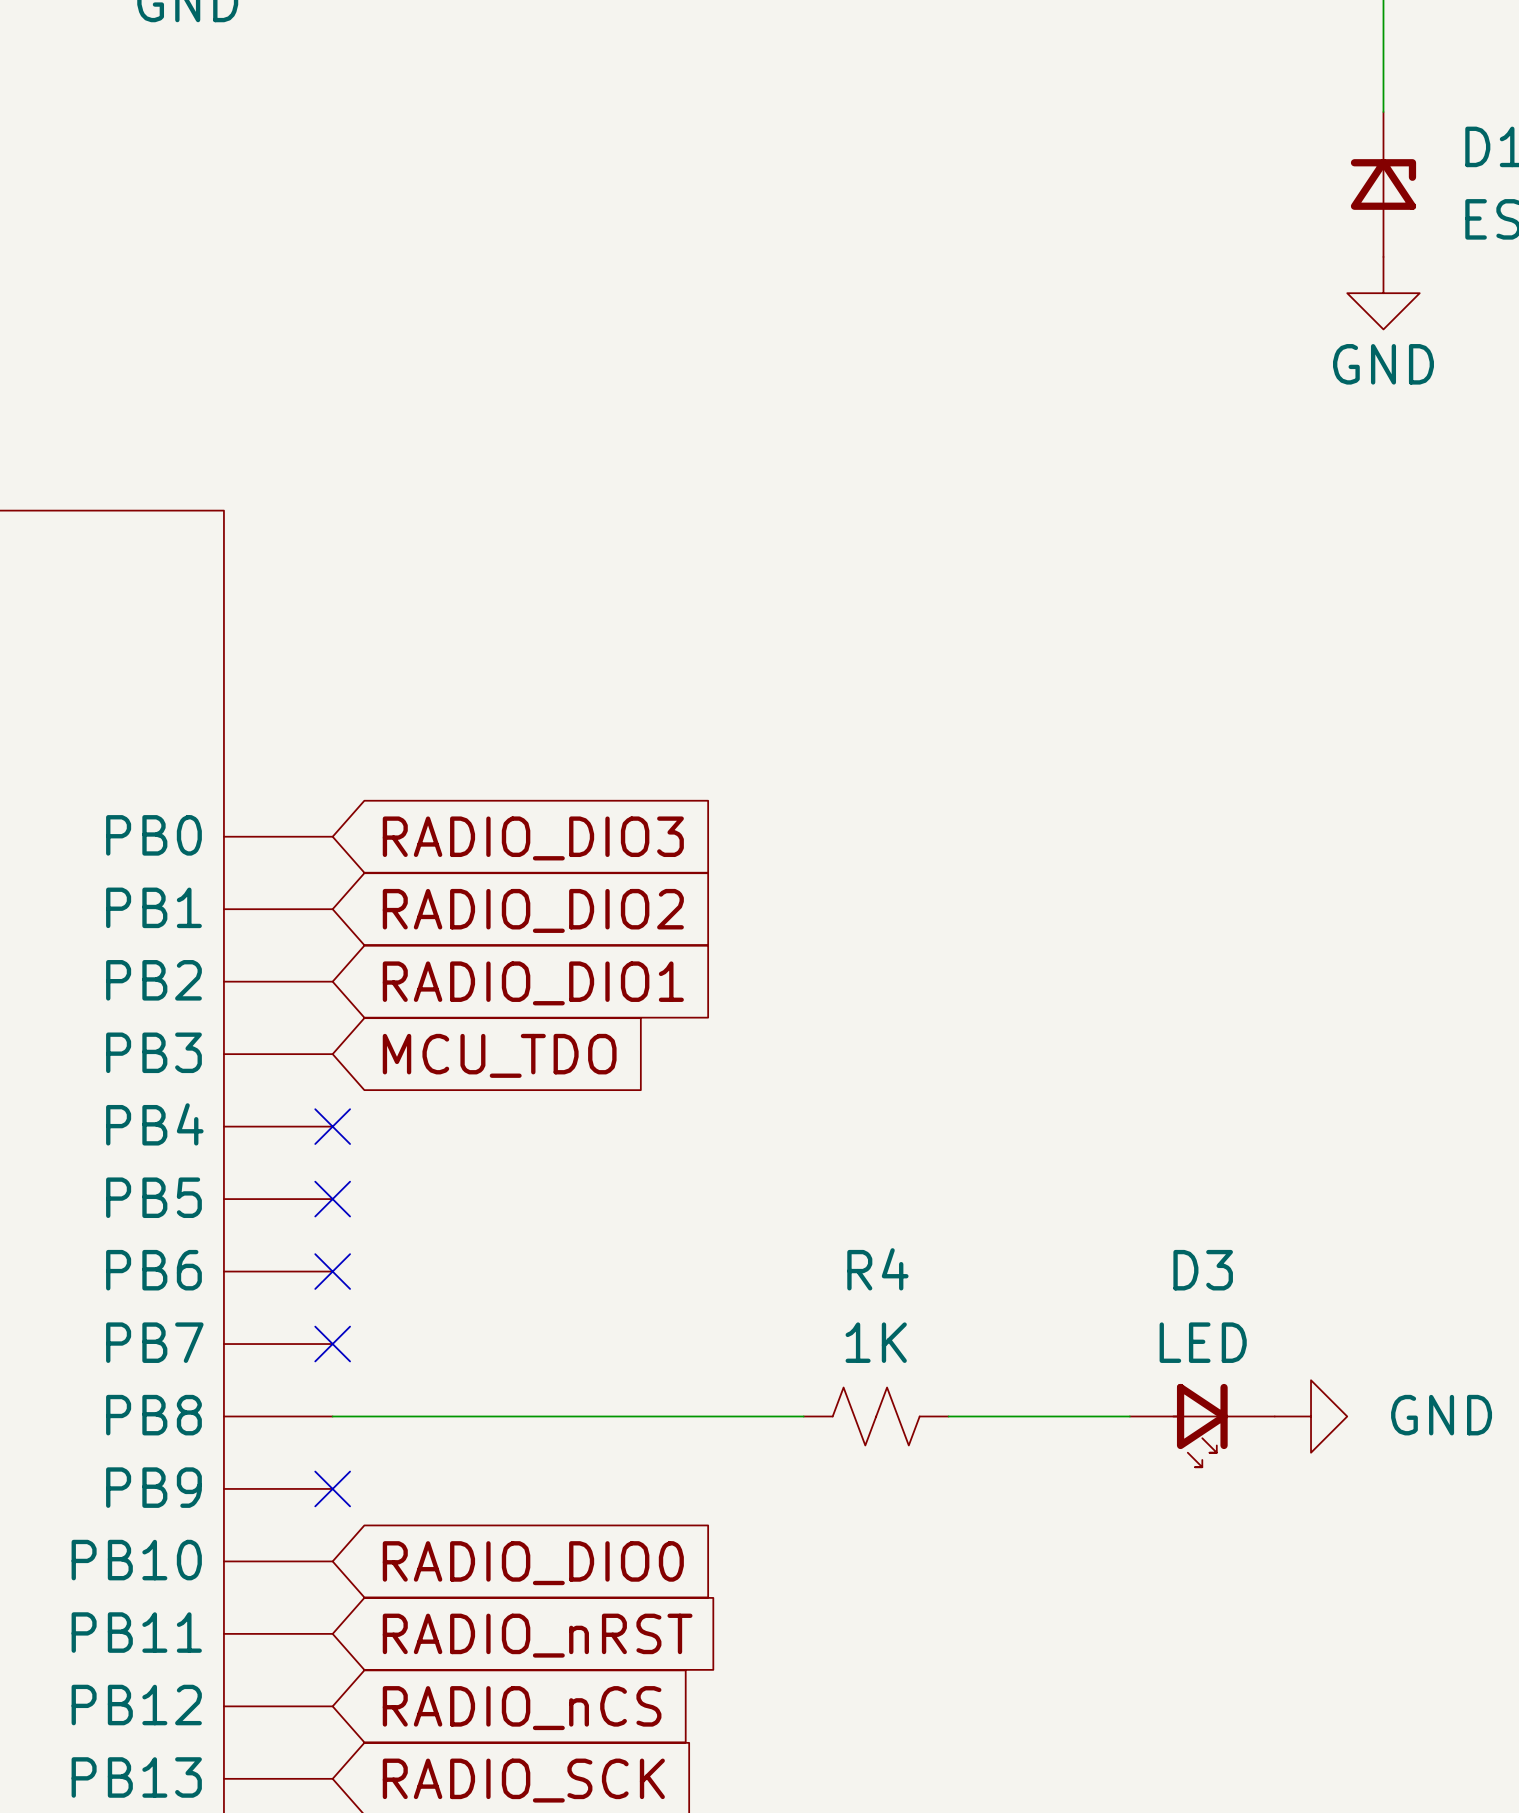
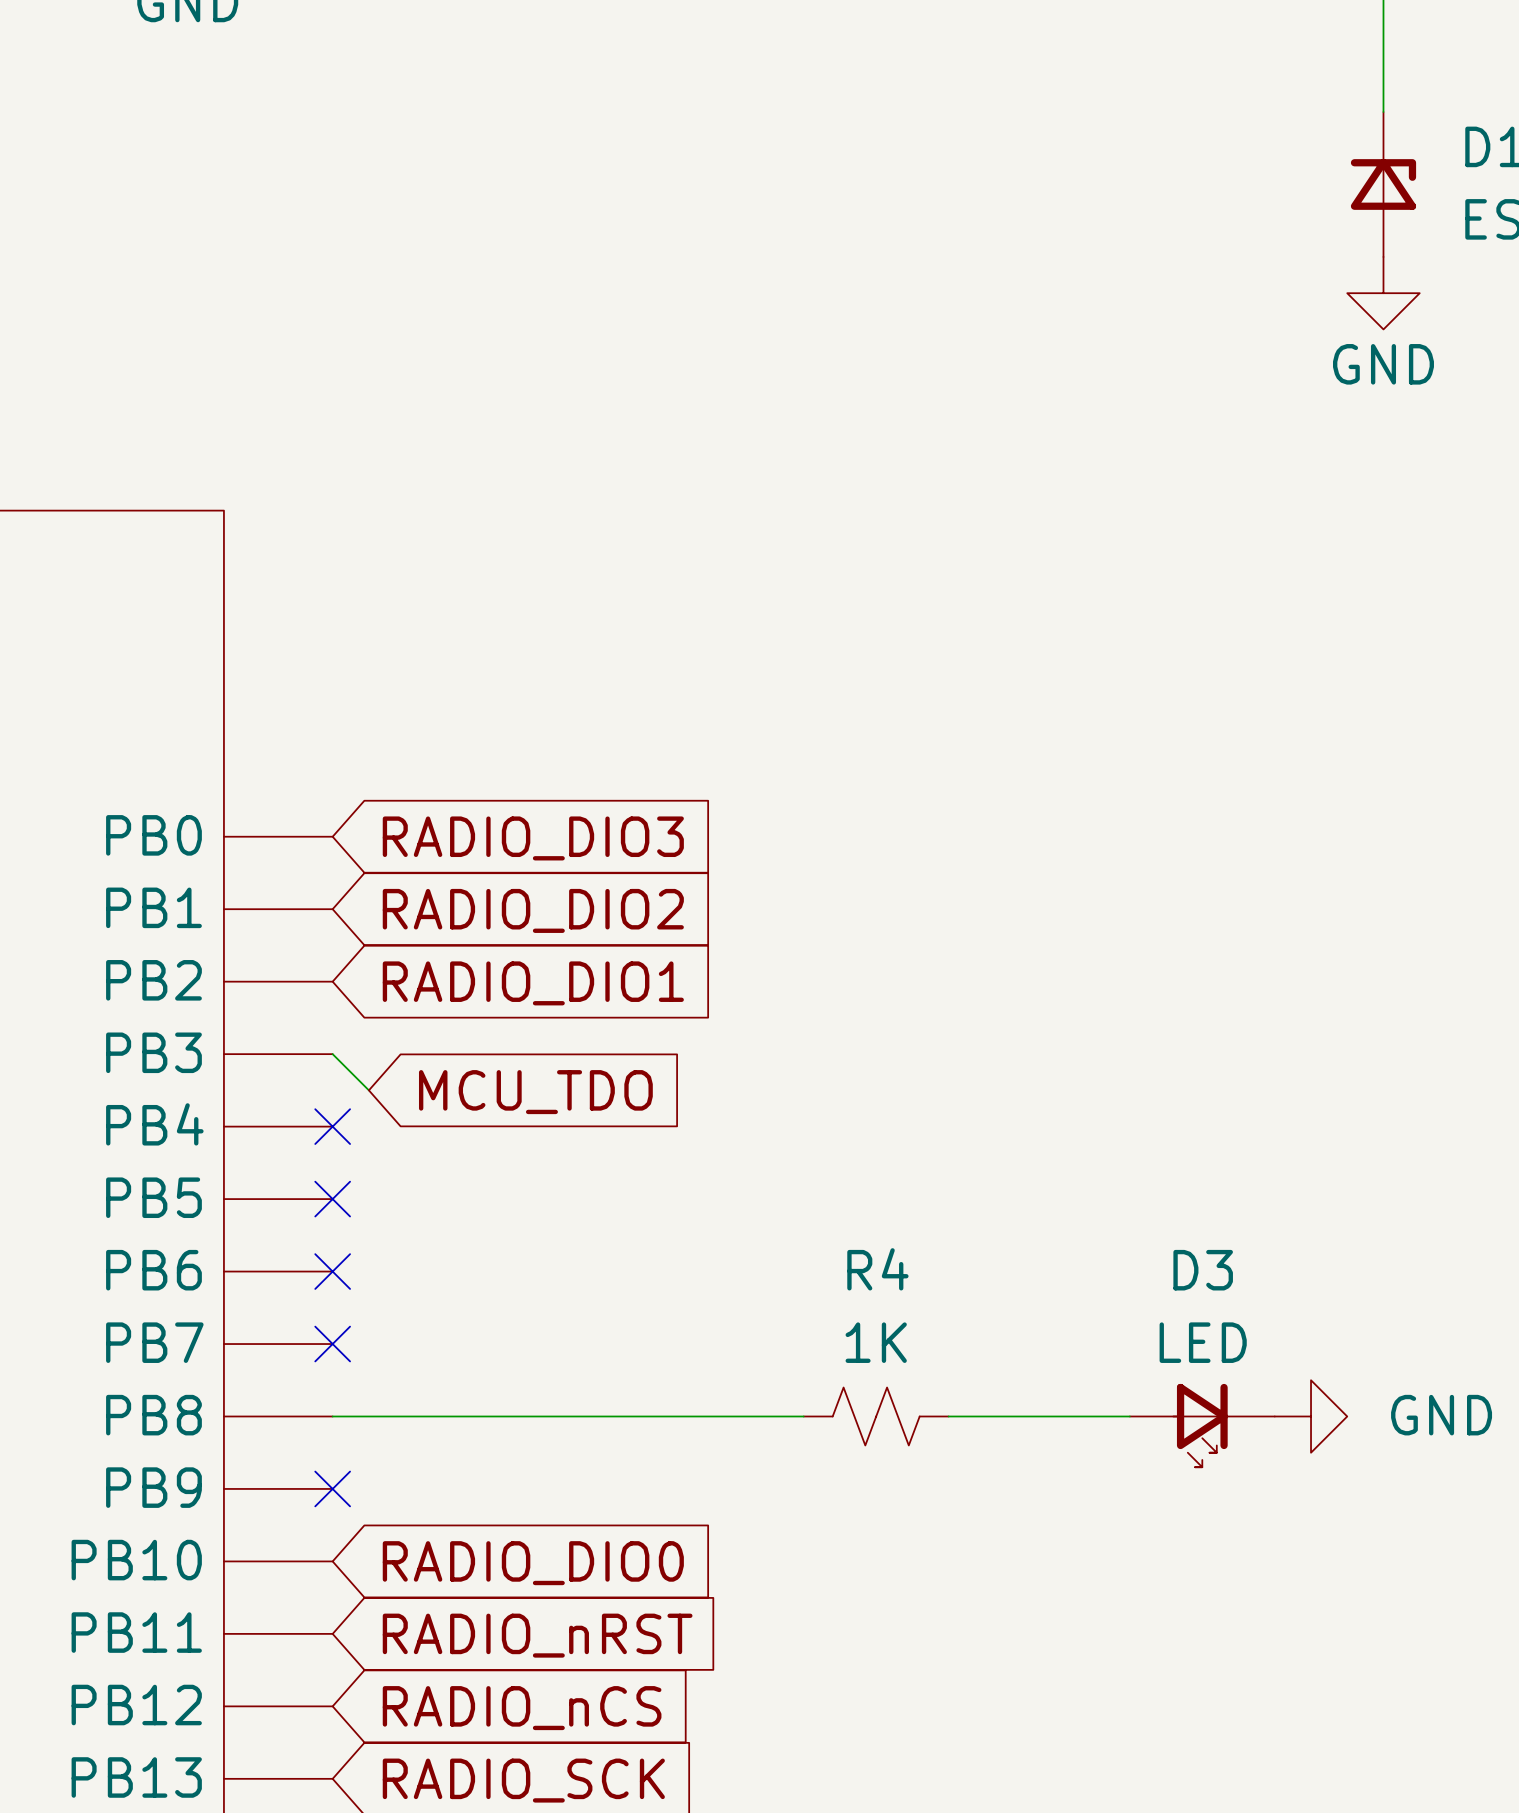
wire: none -> (332, 1054) (368, 1090)
global label position: MCU_TDO (499, 1055) -> MCU_TDO (535, 1092)

